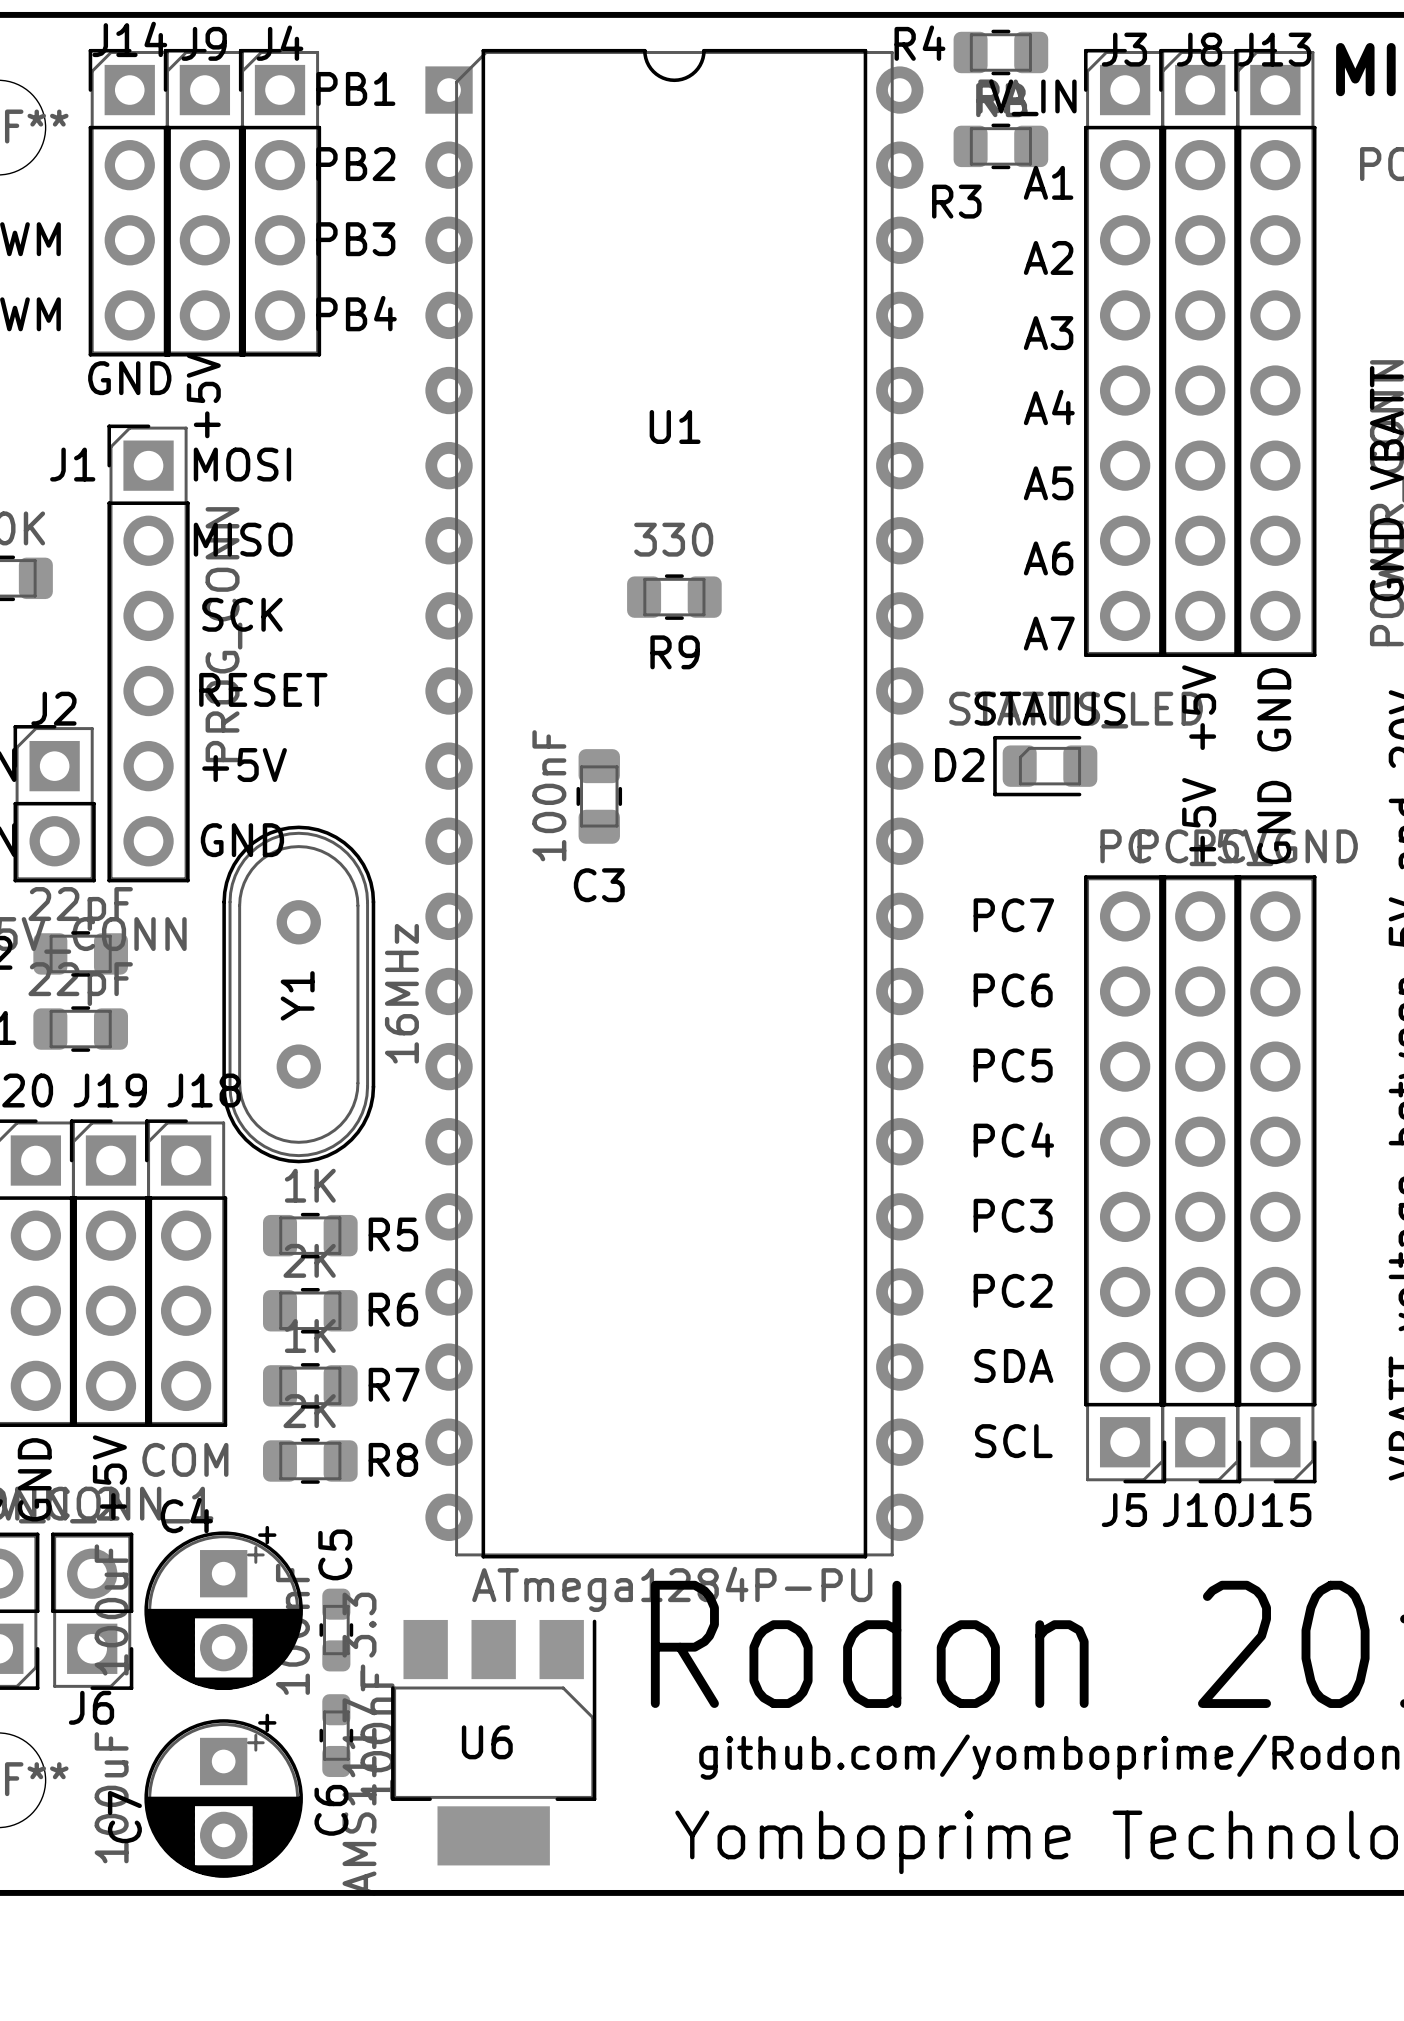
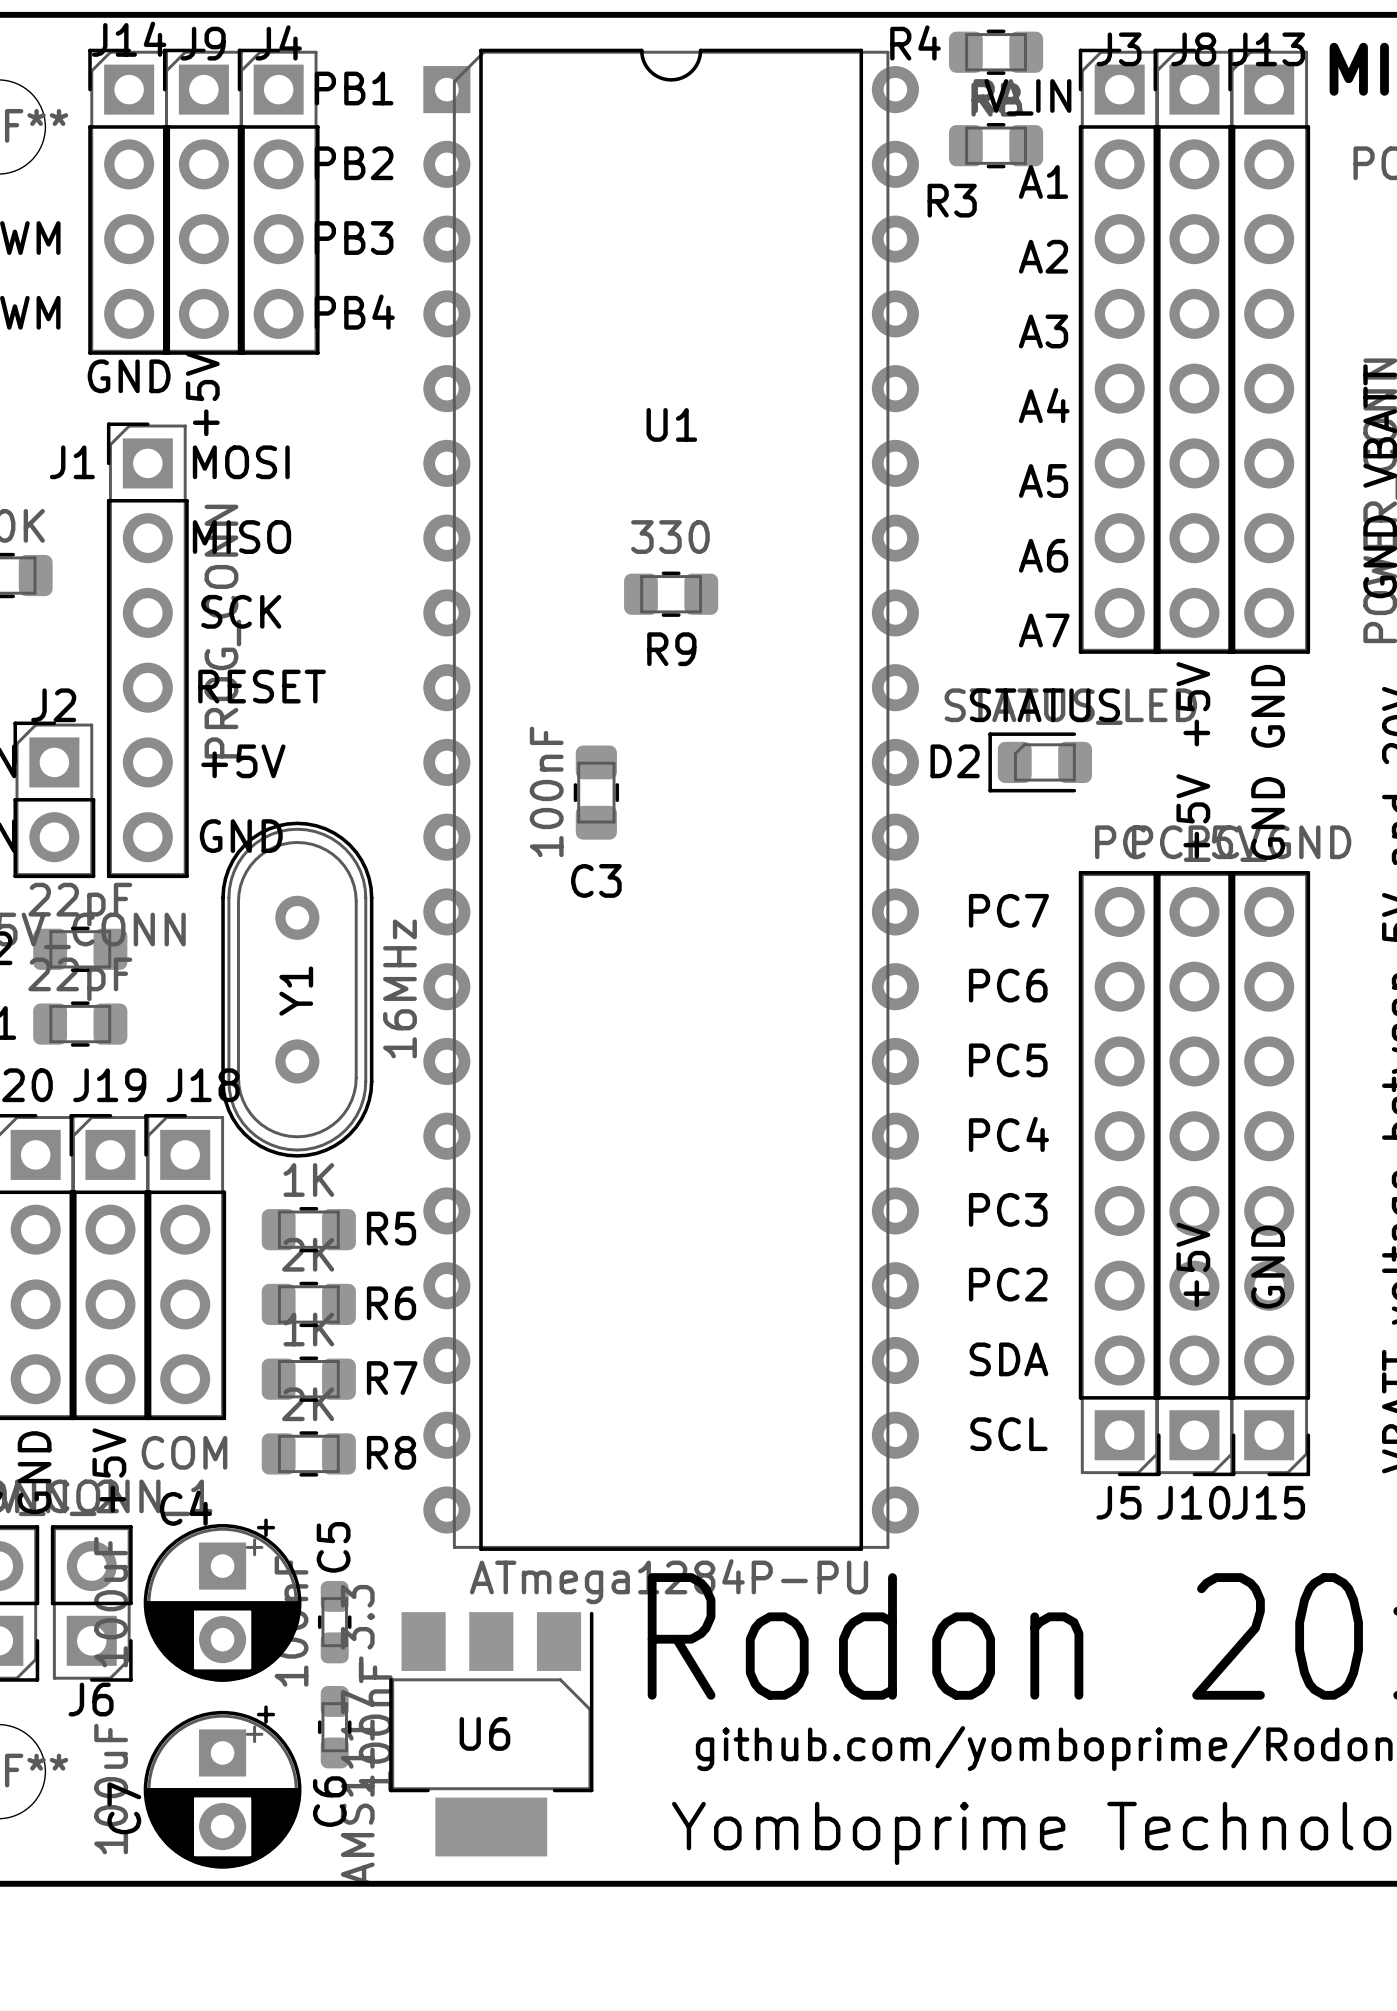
text: none -> +5V (1193, 1264)
text: none -> GND (1268, 1267)

